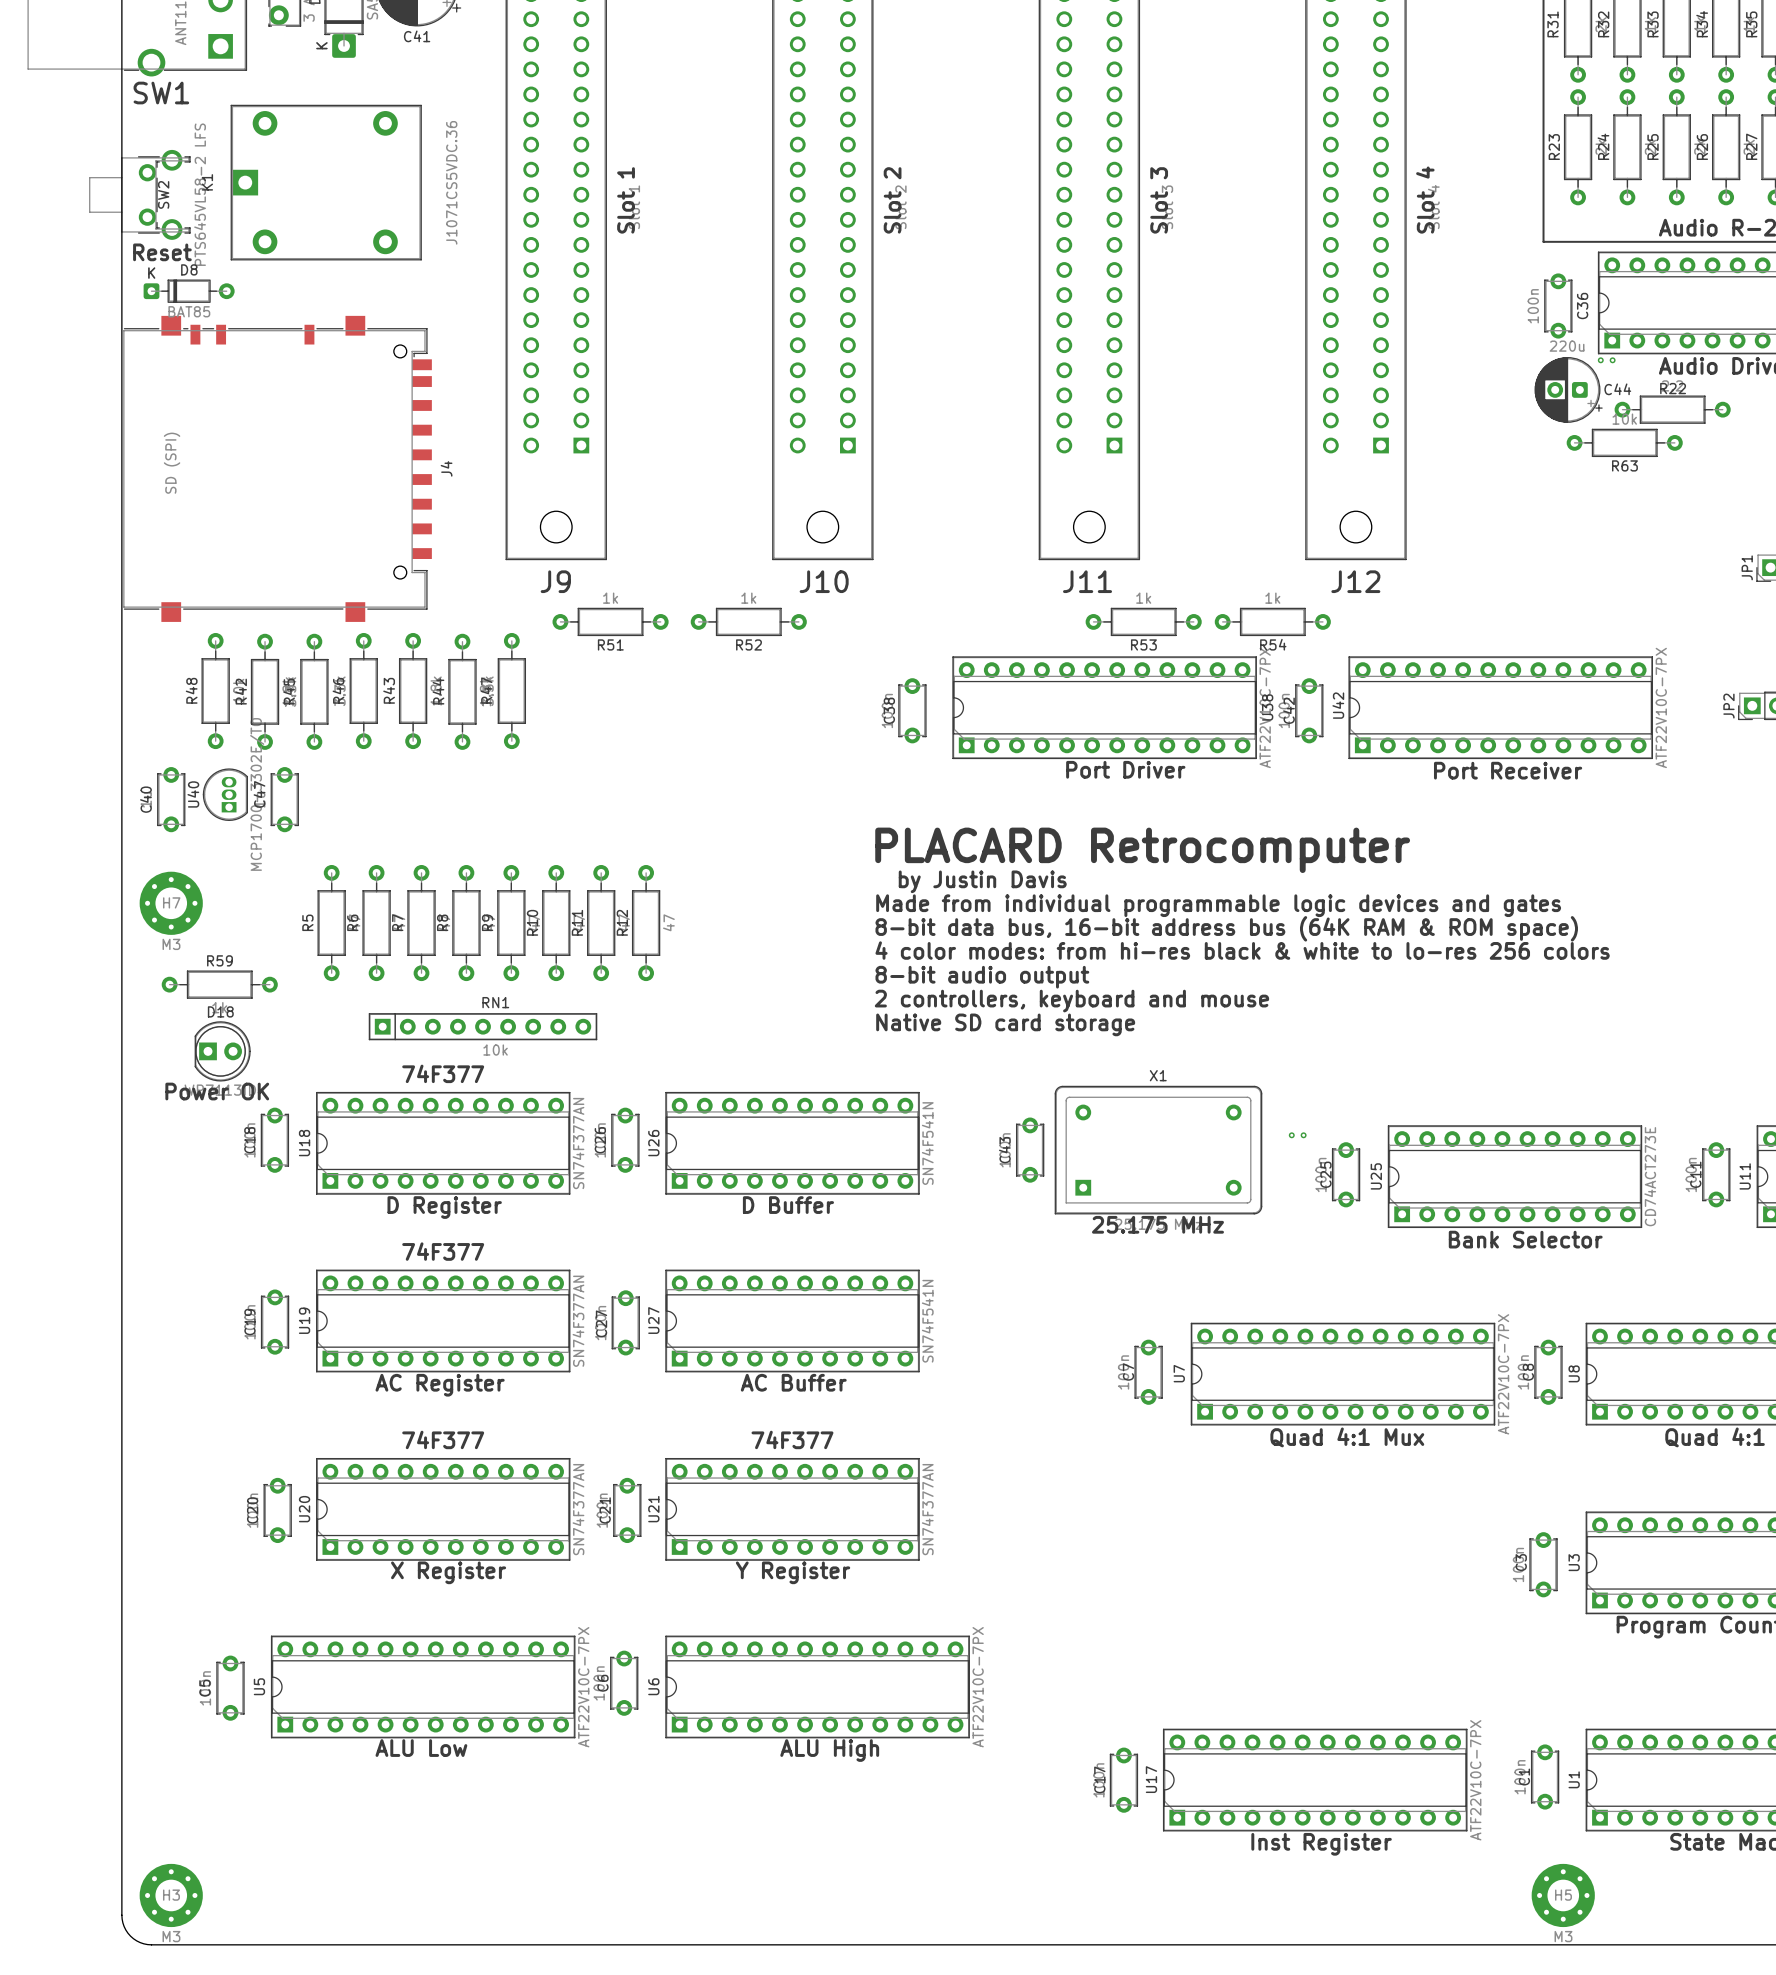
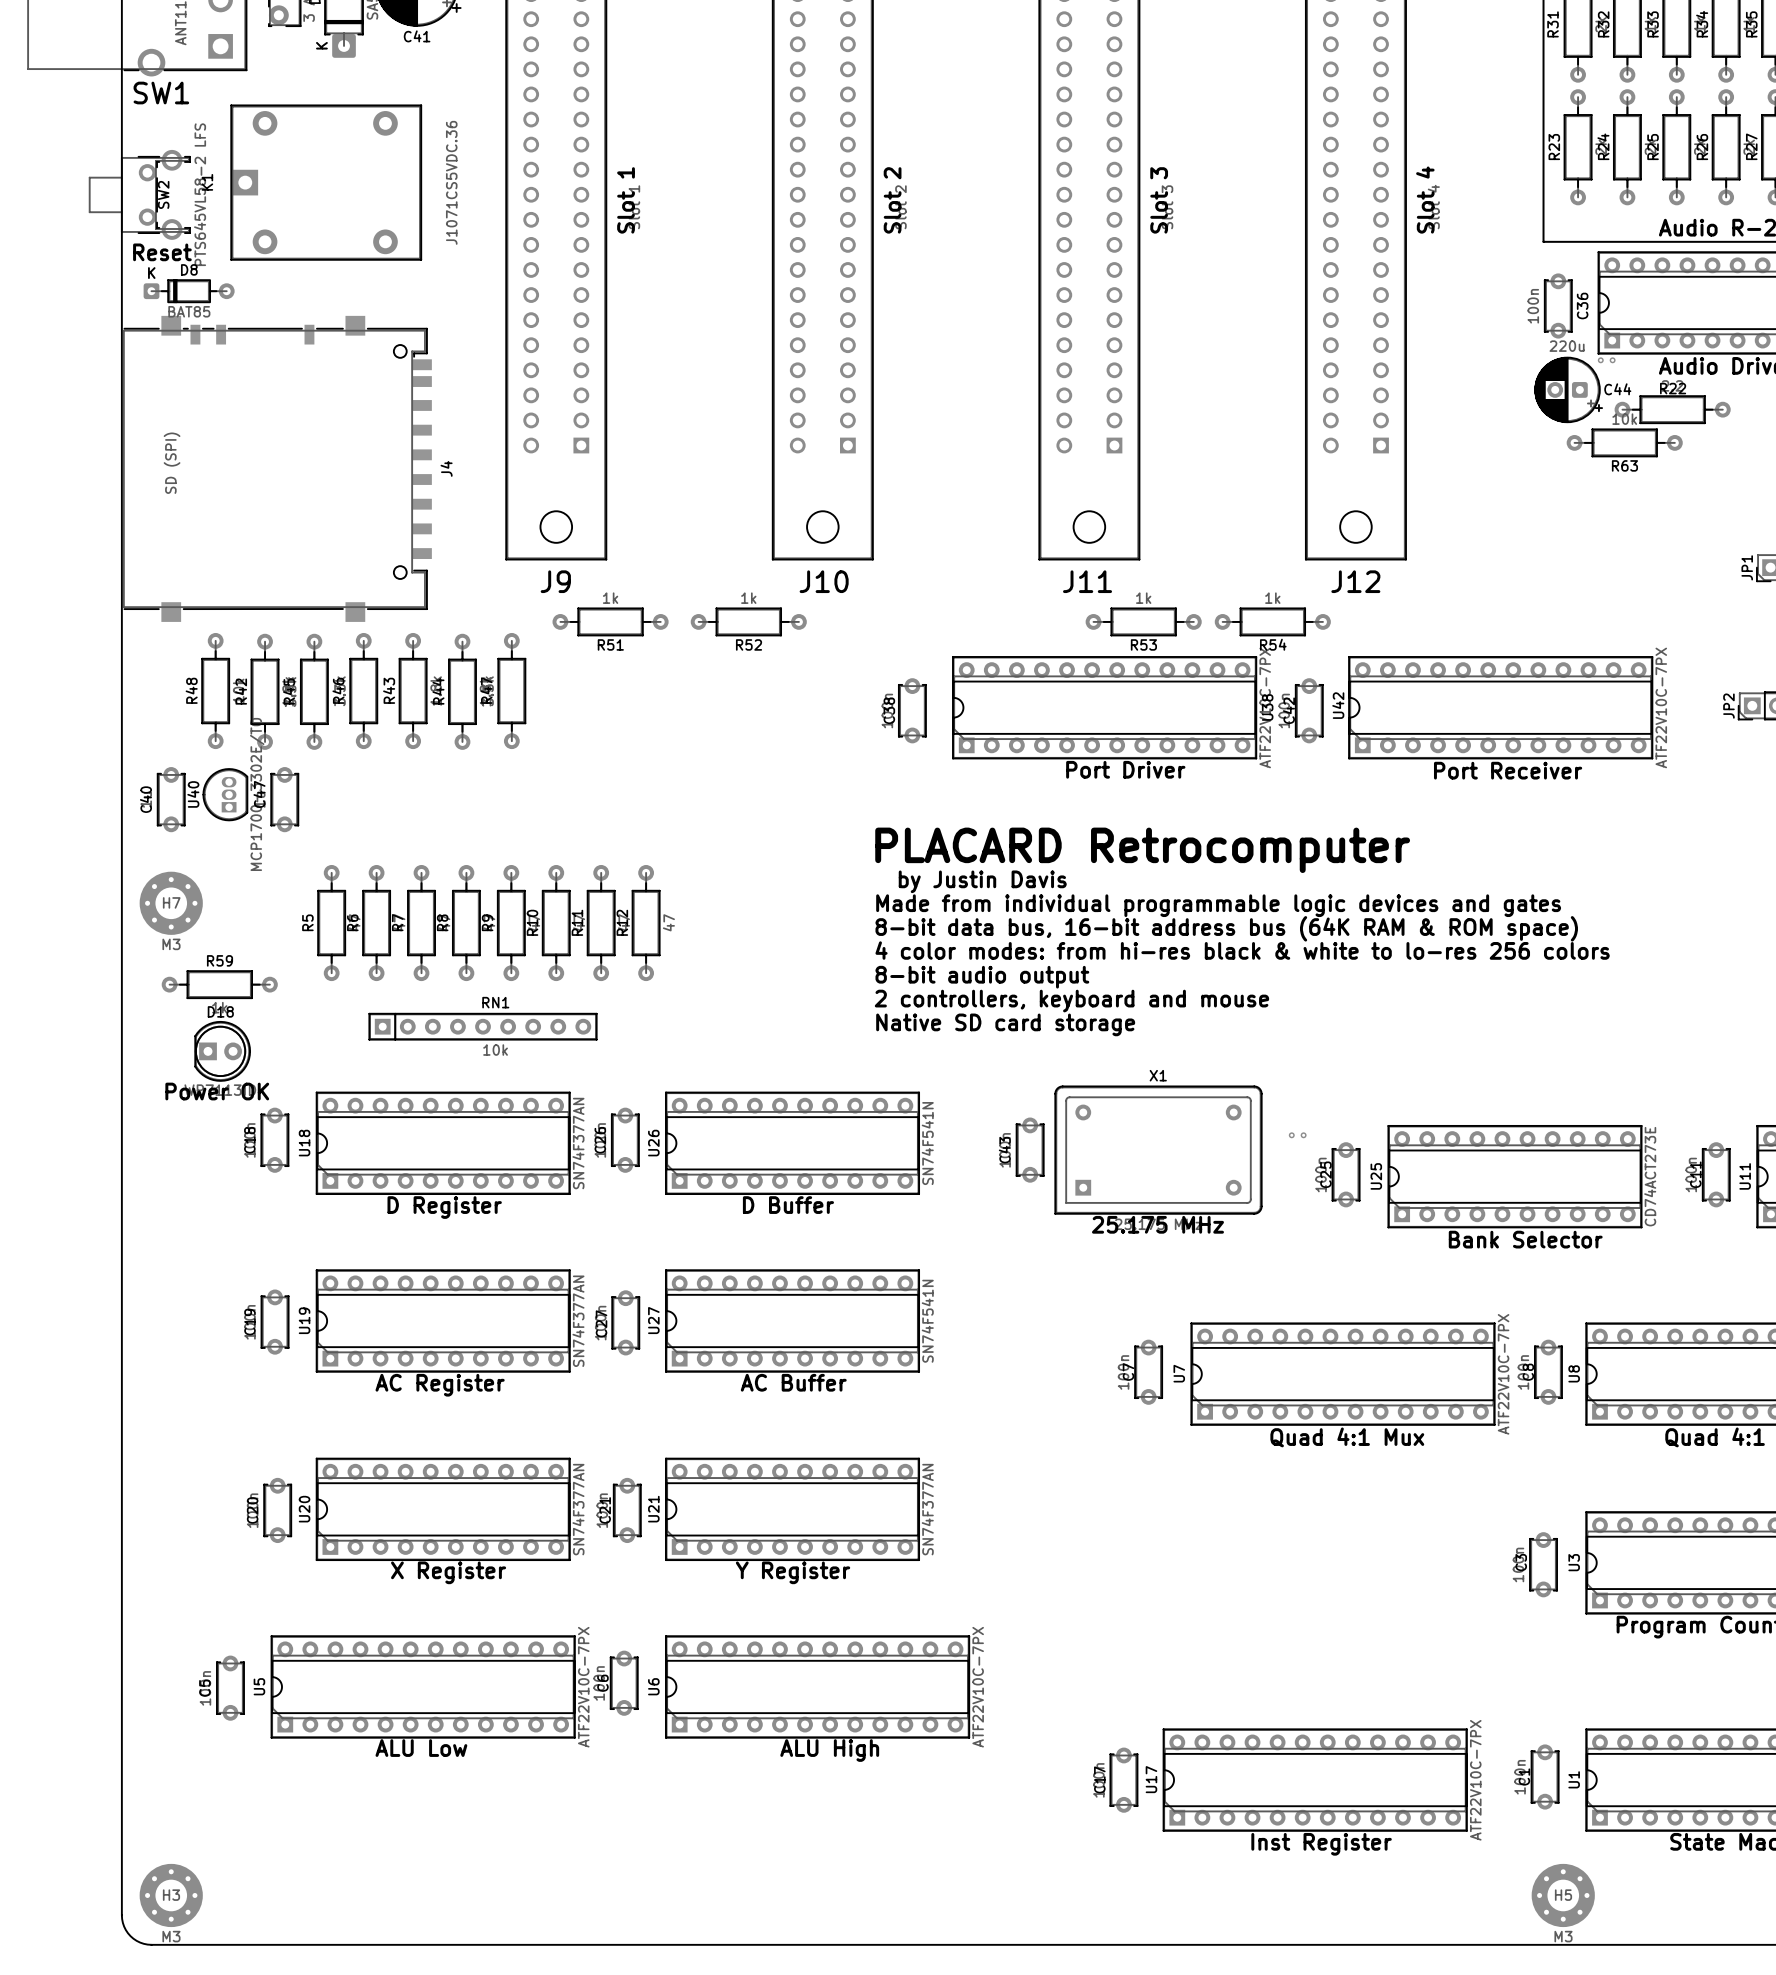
text: 74F377 (443, 1073) -> none
text: 74F377 (443, 1251) -> none
text: 74F377 (443, 1439) -> none
text: 74F377 (792, 1439) -> none

